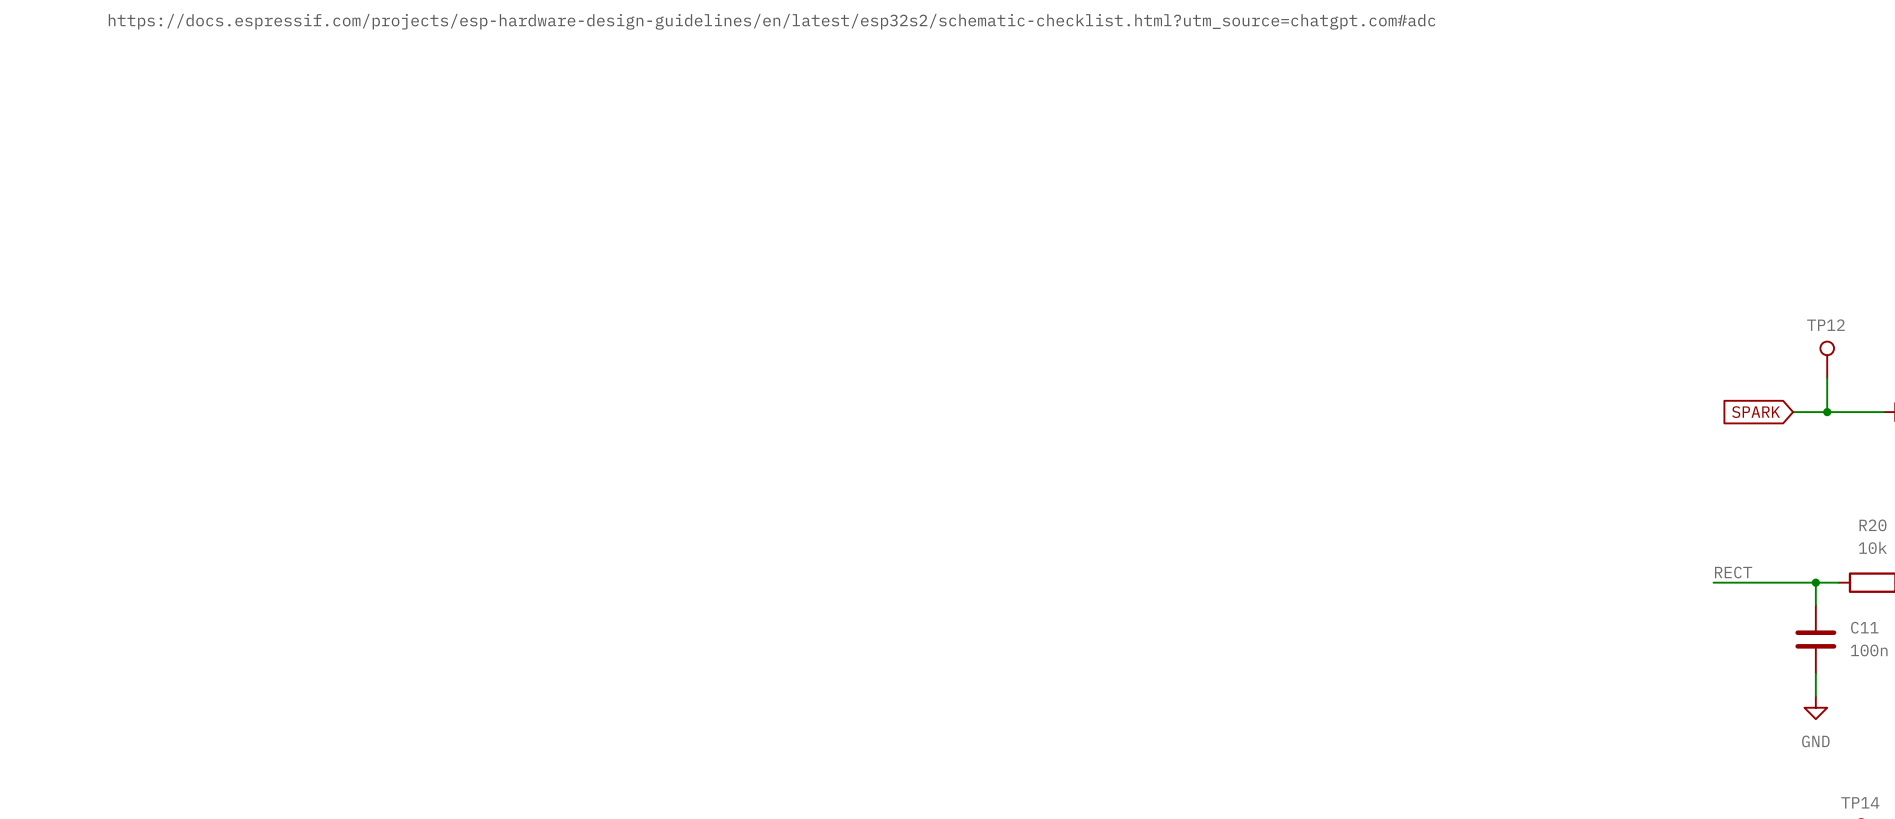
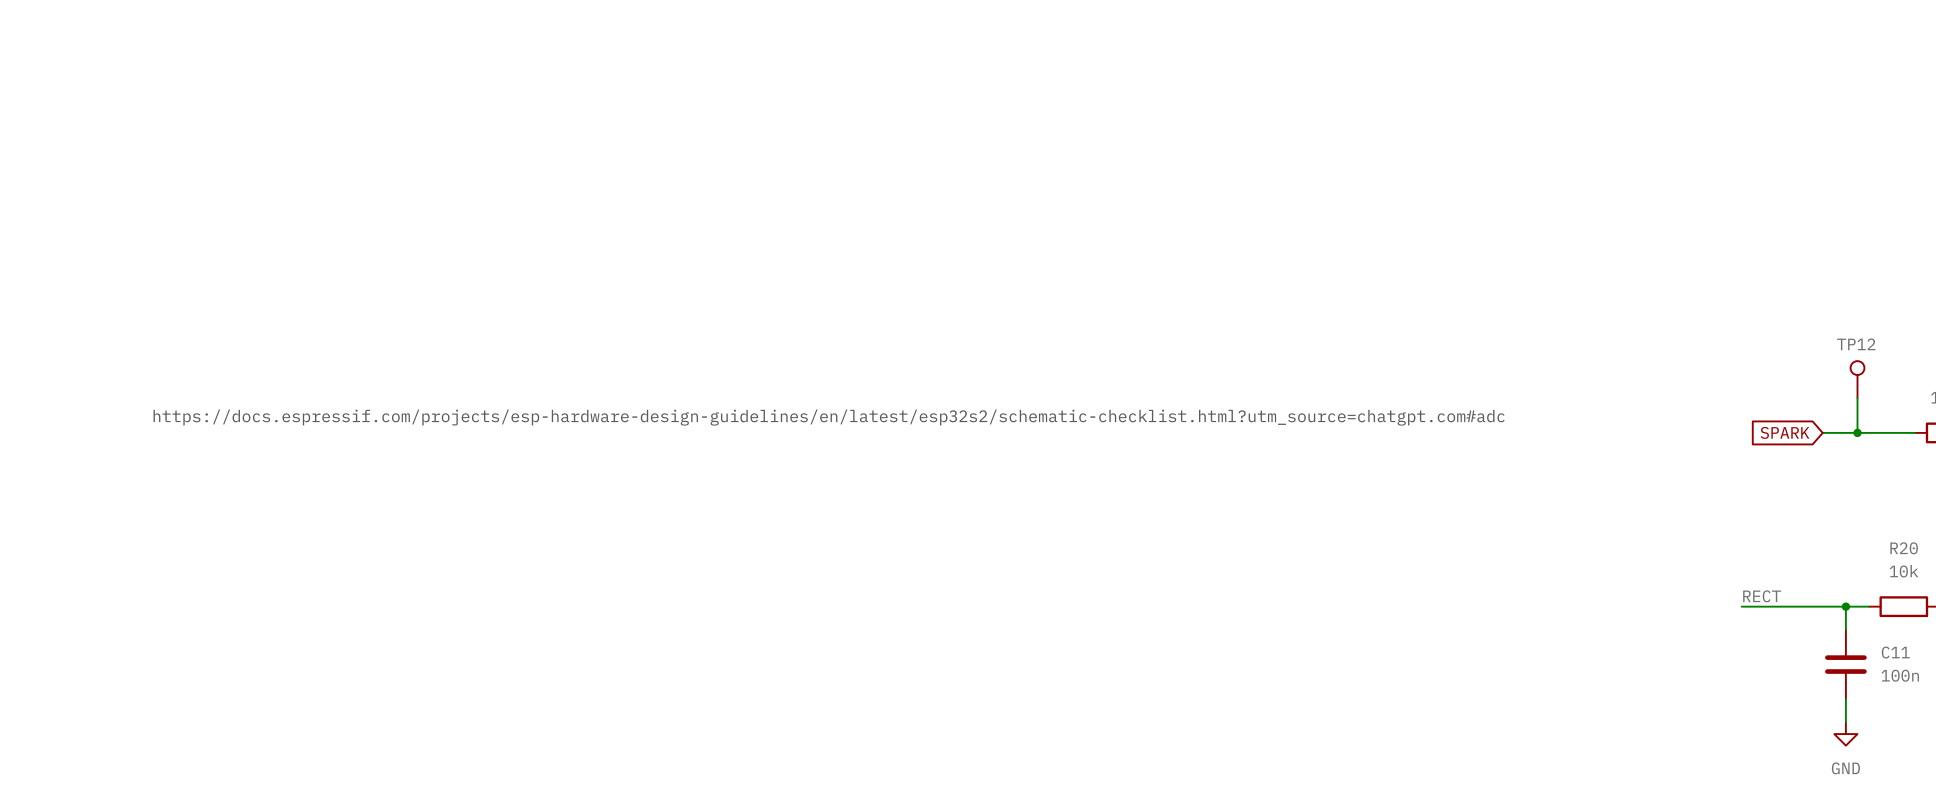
text: https://docs.espressif.com/projects/esp-hardware-design-guidelines/en/latest/esp32s2/schematic-checklist.html?utm_source=chatgpt.com#adc (772, 21) -> none
text: none -> https://docs.espressif.com/projects/esp-hardware-design-guidelines/en/latest/esp32s2/schematic-checklist.html?utm_source=chatgpt.com#adc (829, 417)

